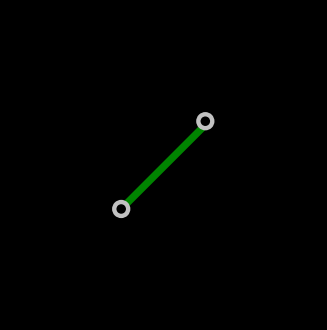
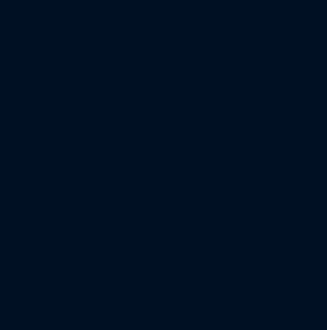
track: (205, 121) (205, 124) (121, 208) -> none
via: (205, 121) -> none
via: (121, 208) -> none

